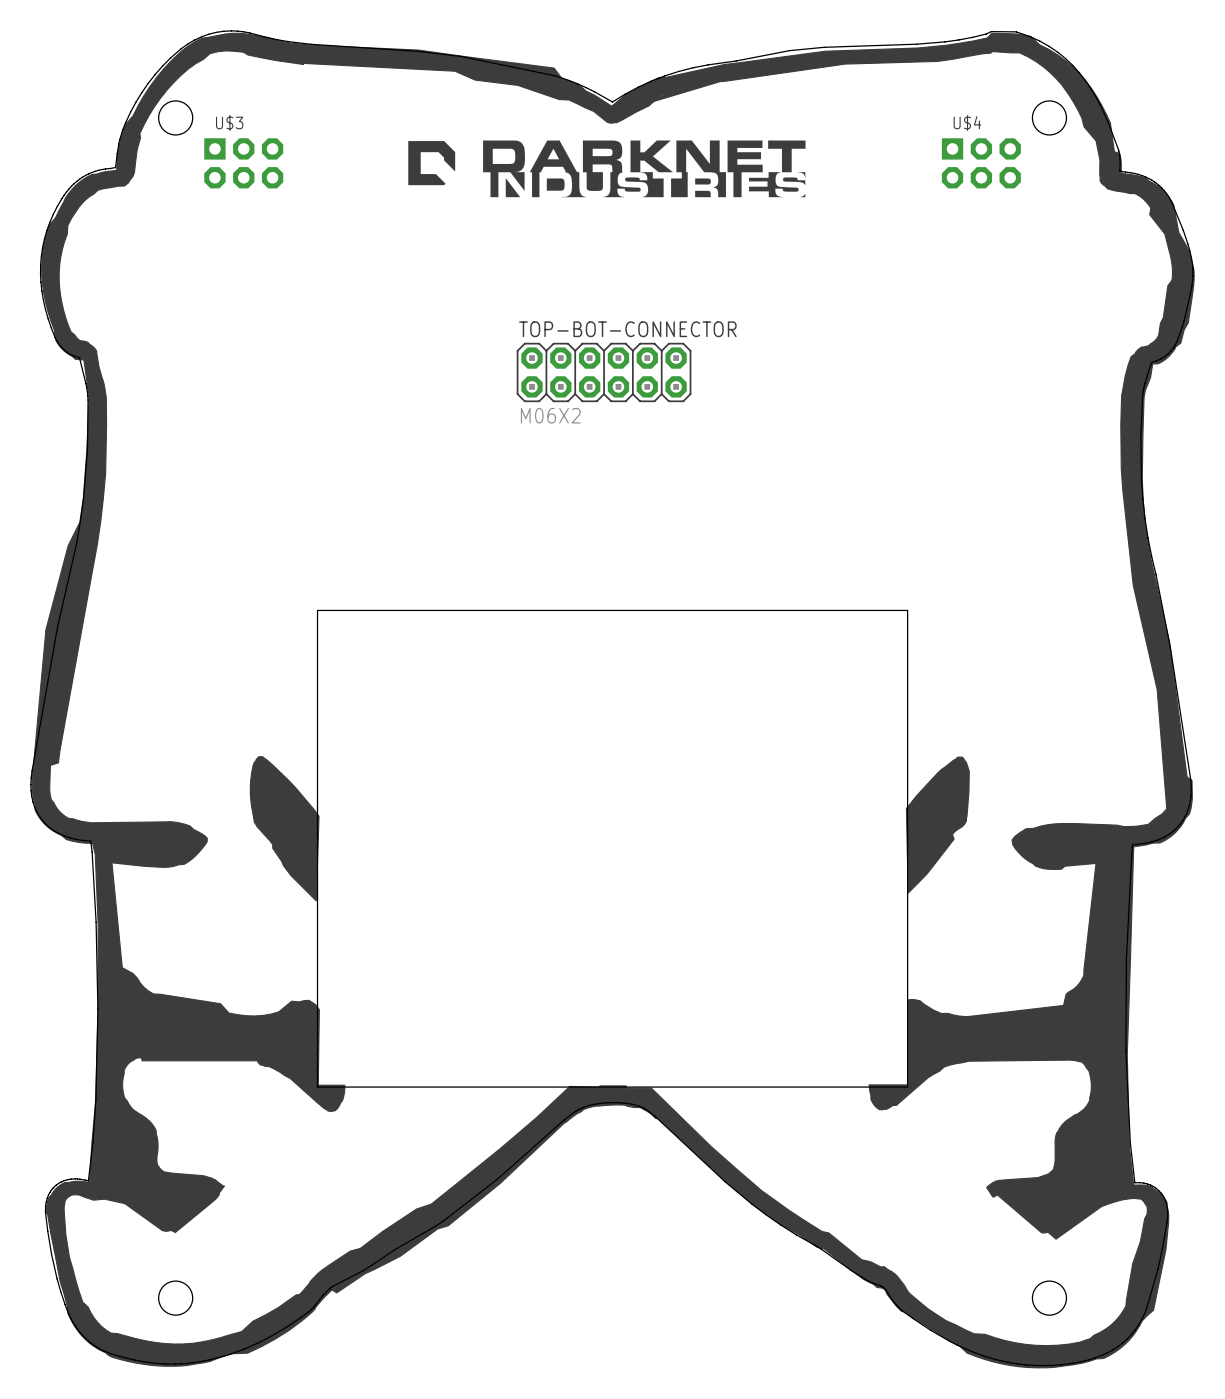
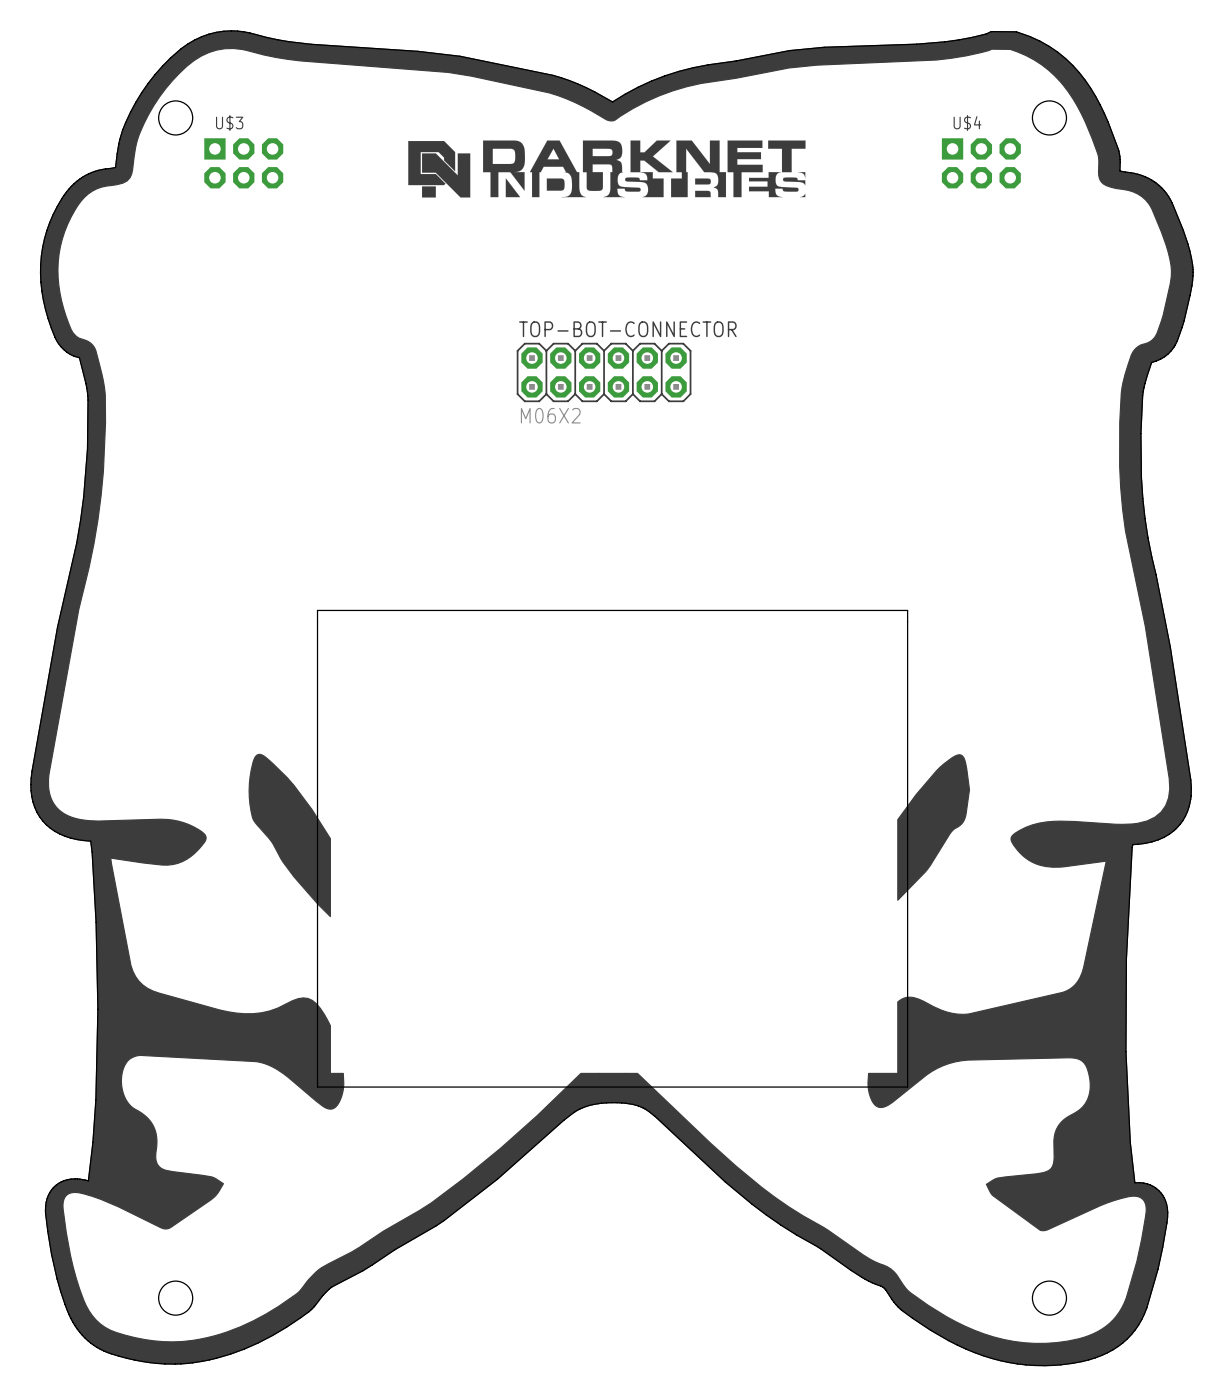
drawing shape: [31, 32, 1195, 1369] -> [30, 30, 1194, 1367]
drawing shape: [408, 140, 806, 198] -> [408, 140, 806, 198]
drawing shape: [249, 756, 320, 902] -> [248, 753, 331, 918]
drawing shape: [905, 756, 970, 894] -> [897, 754, 971, 901]
drawing shape: [599, 1085, 627, 1107] -> [598, 1072, 627, 1105]

